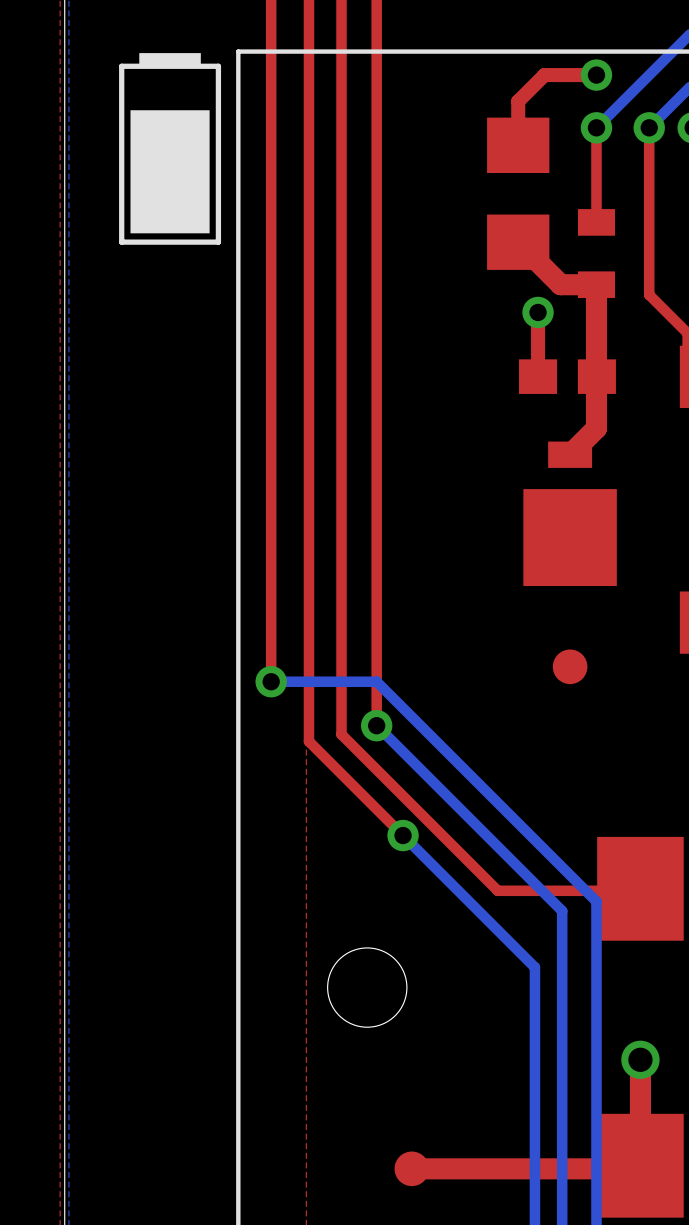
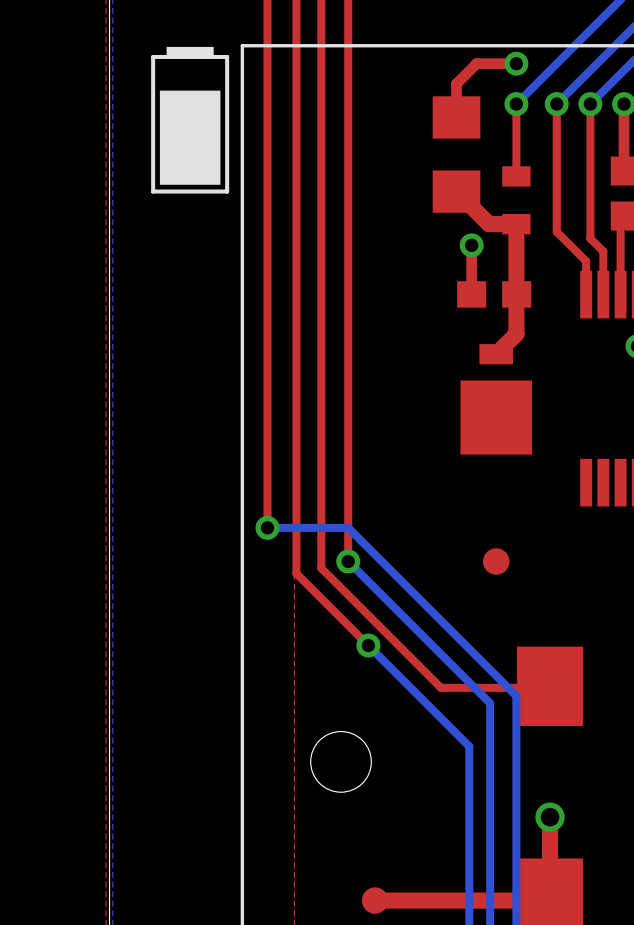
part position: (570, 666) -> (496, 561)

